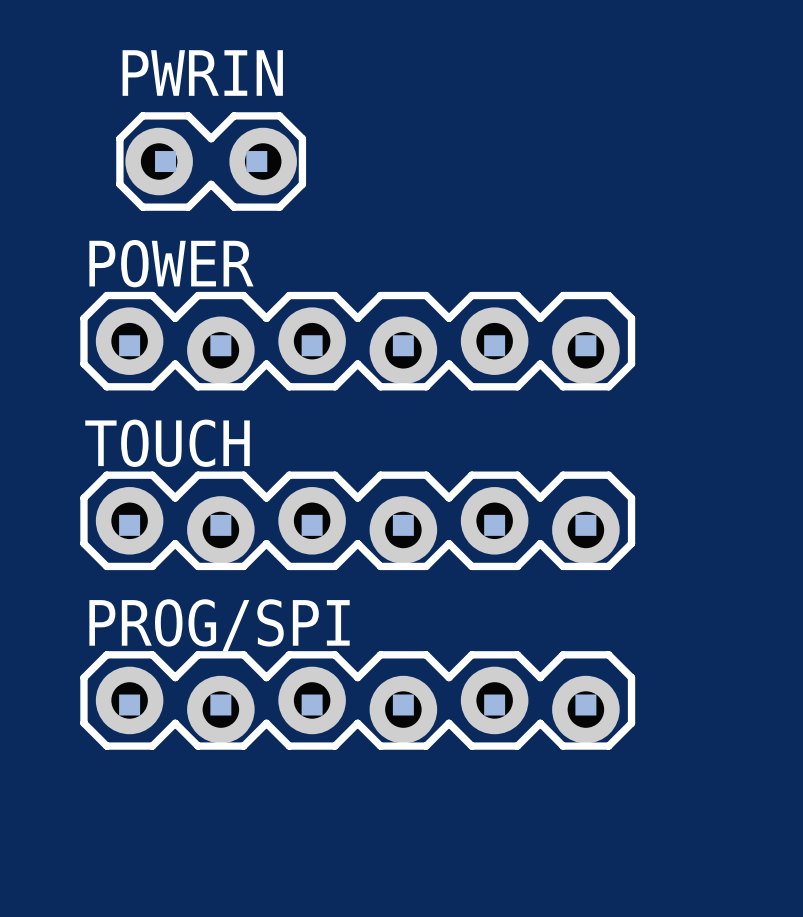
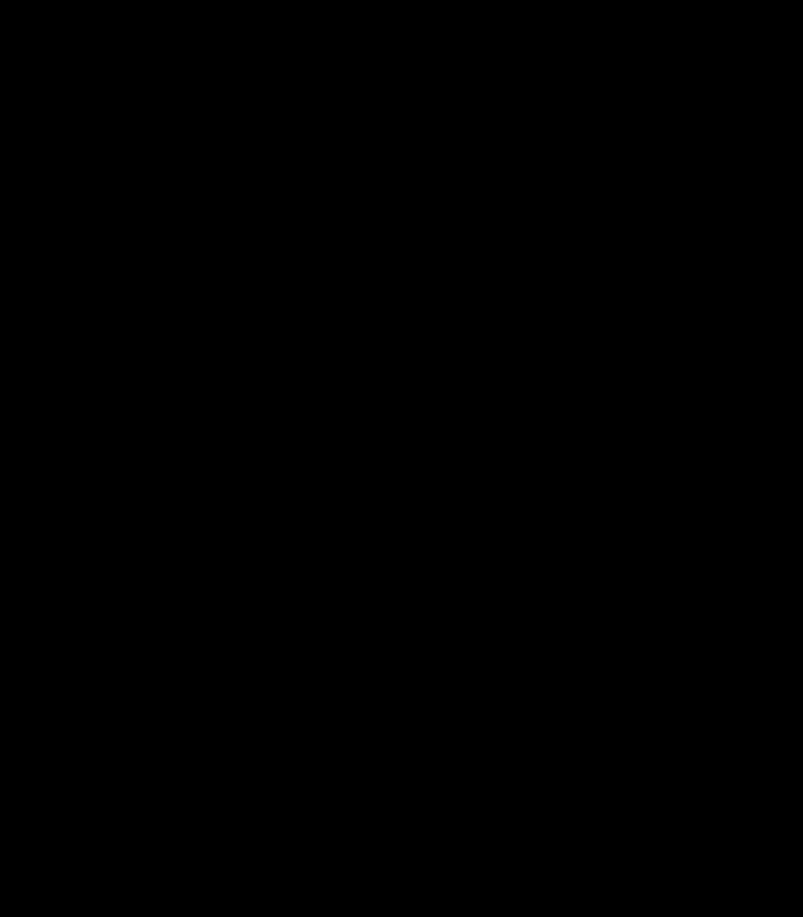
PWRIN: (211, 161) -> none
POWER: (357, 341) -> none
TOUCH: (357, 520) -> none
PROG/SPI: (357, 700) -> none

